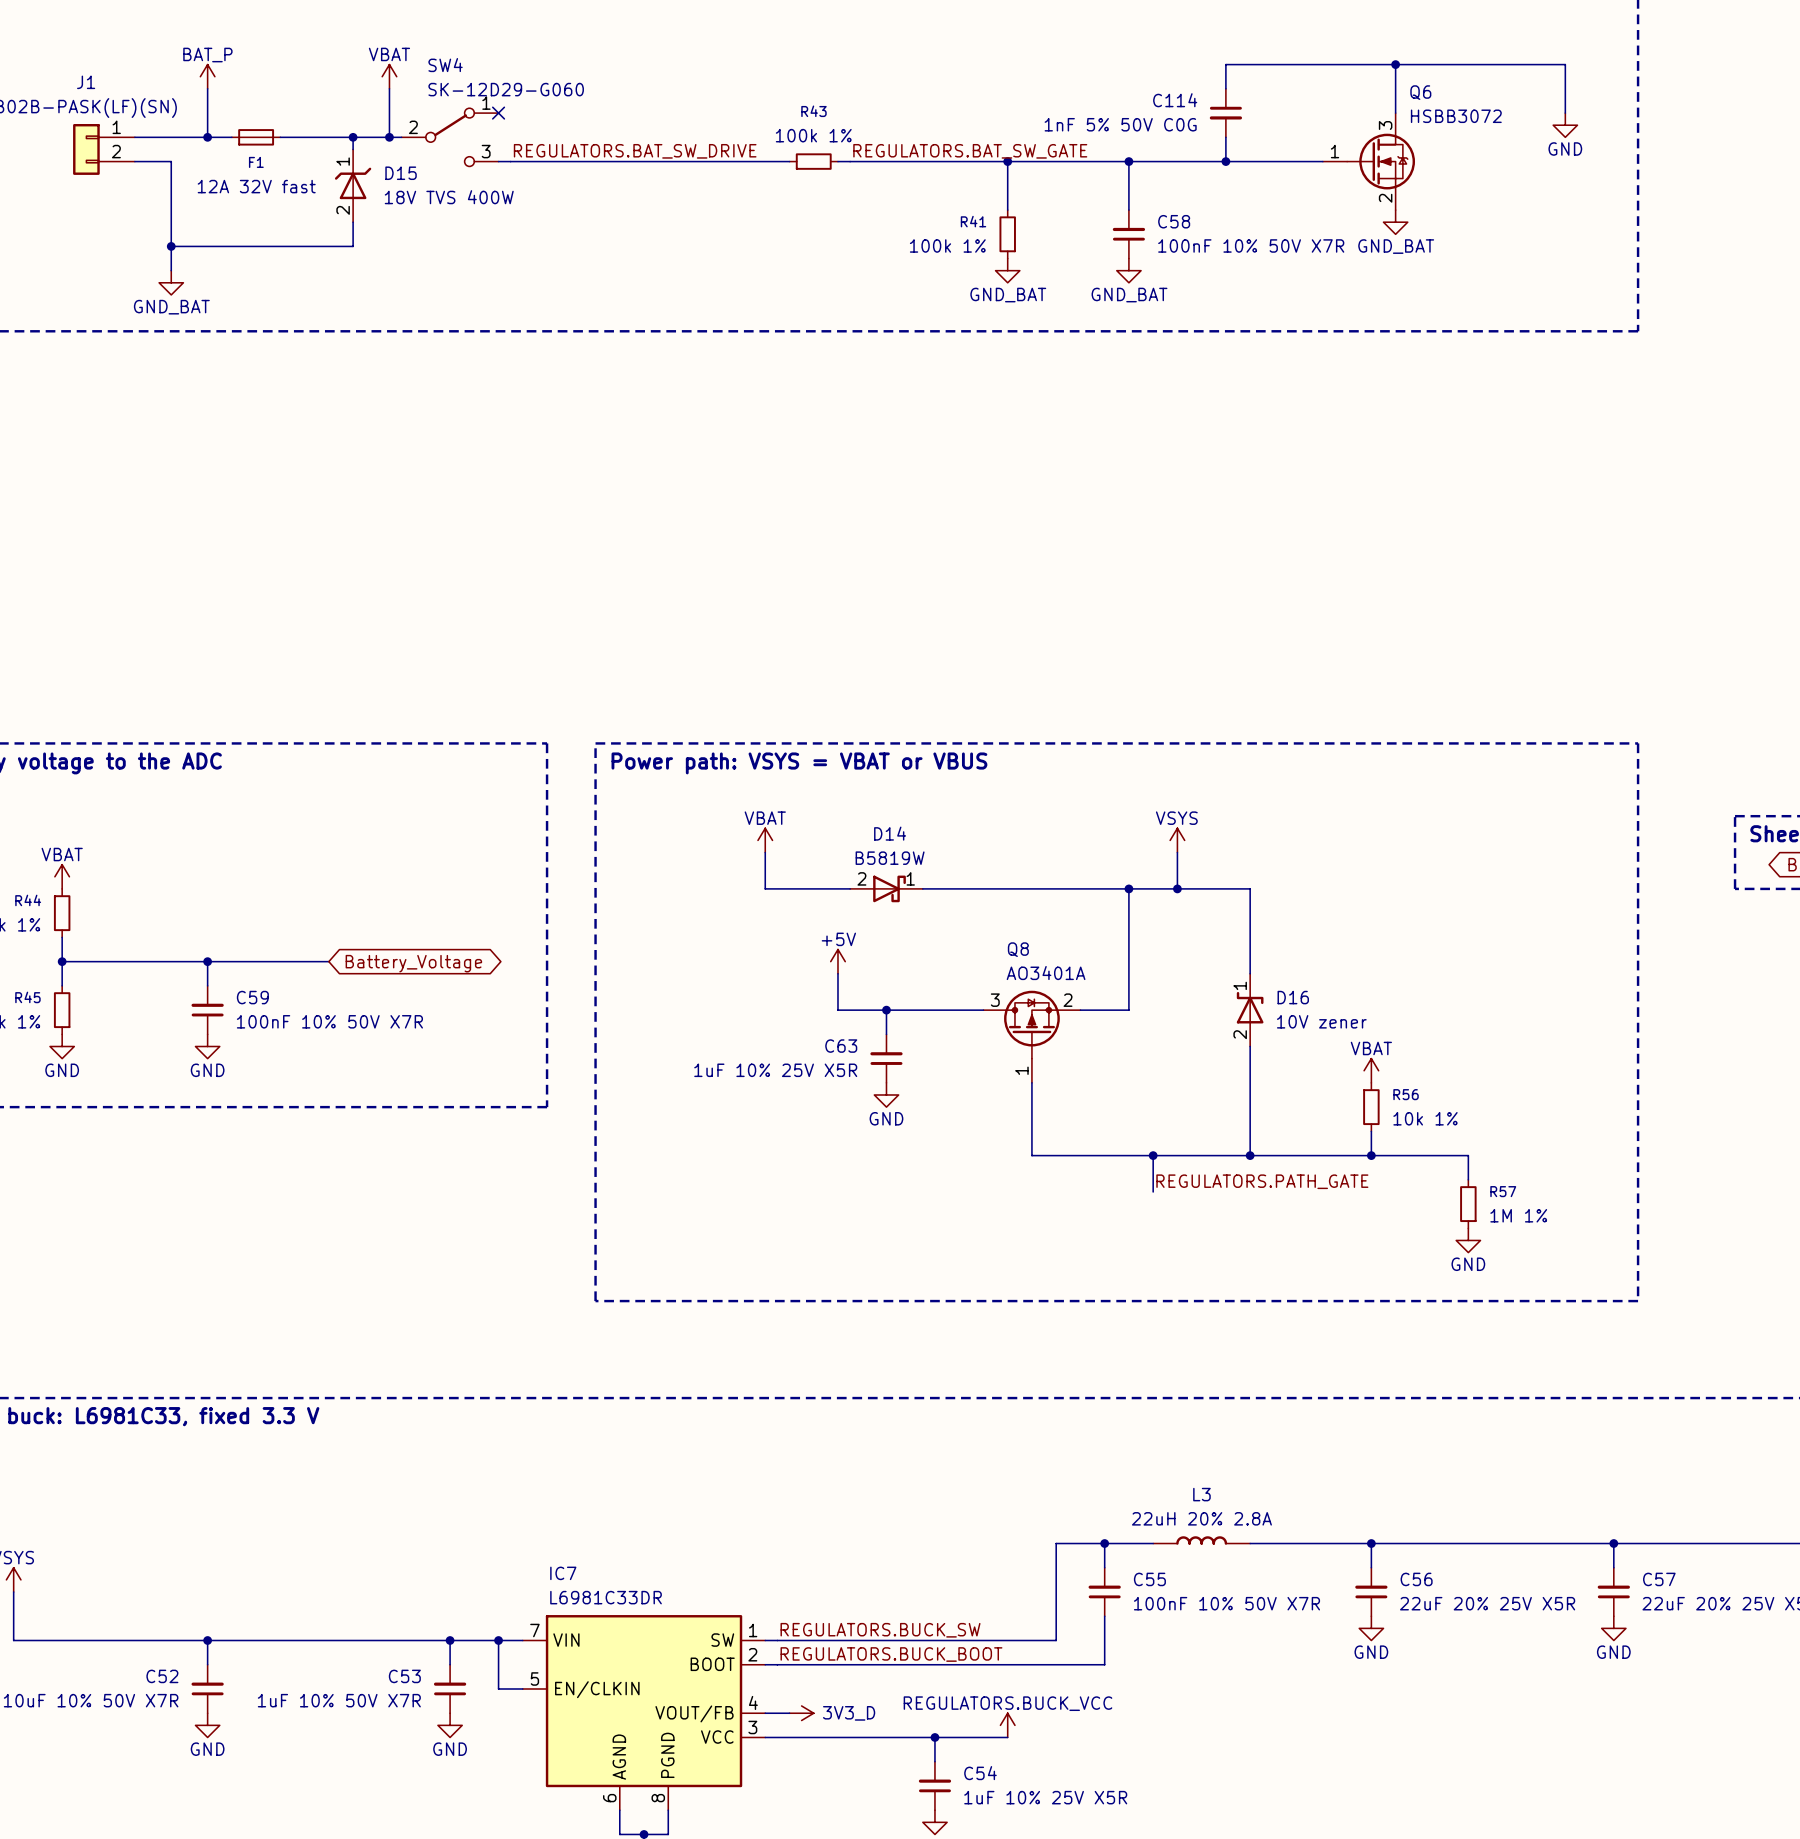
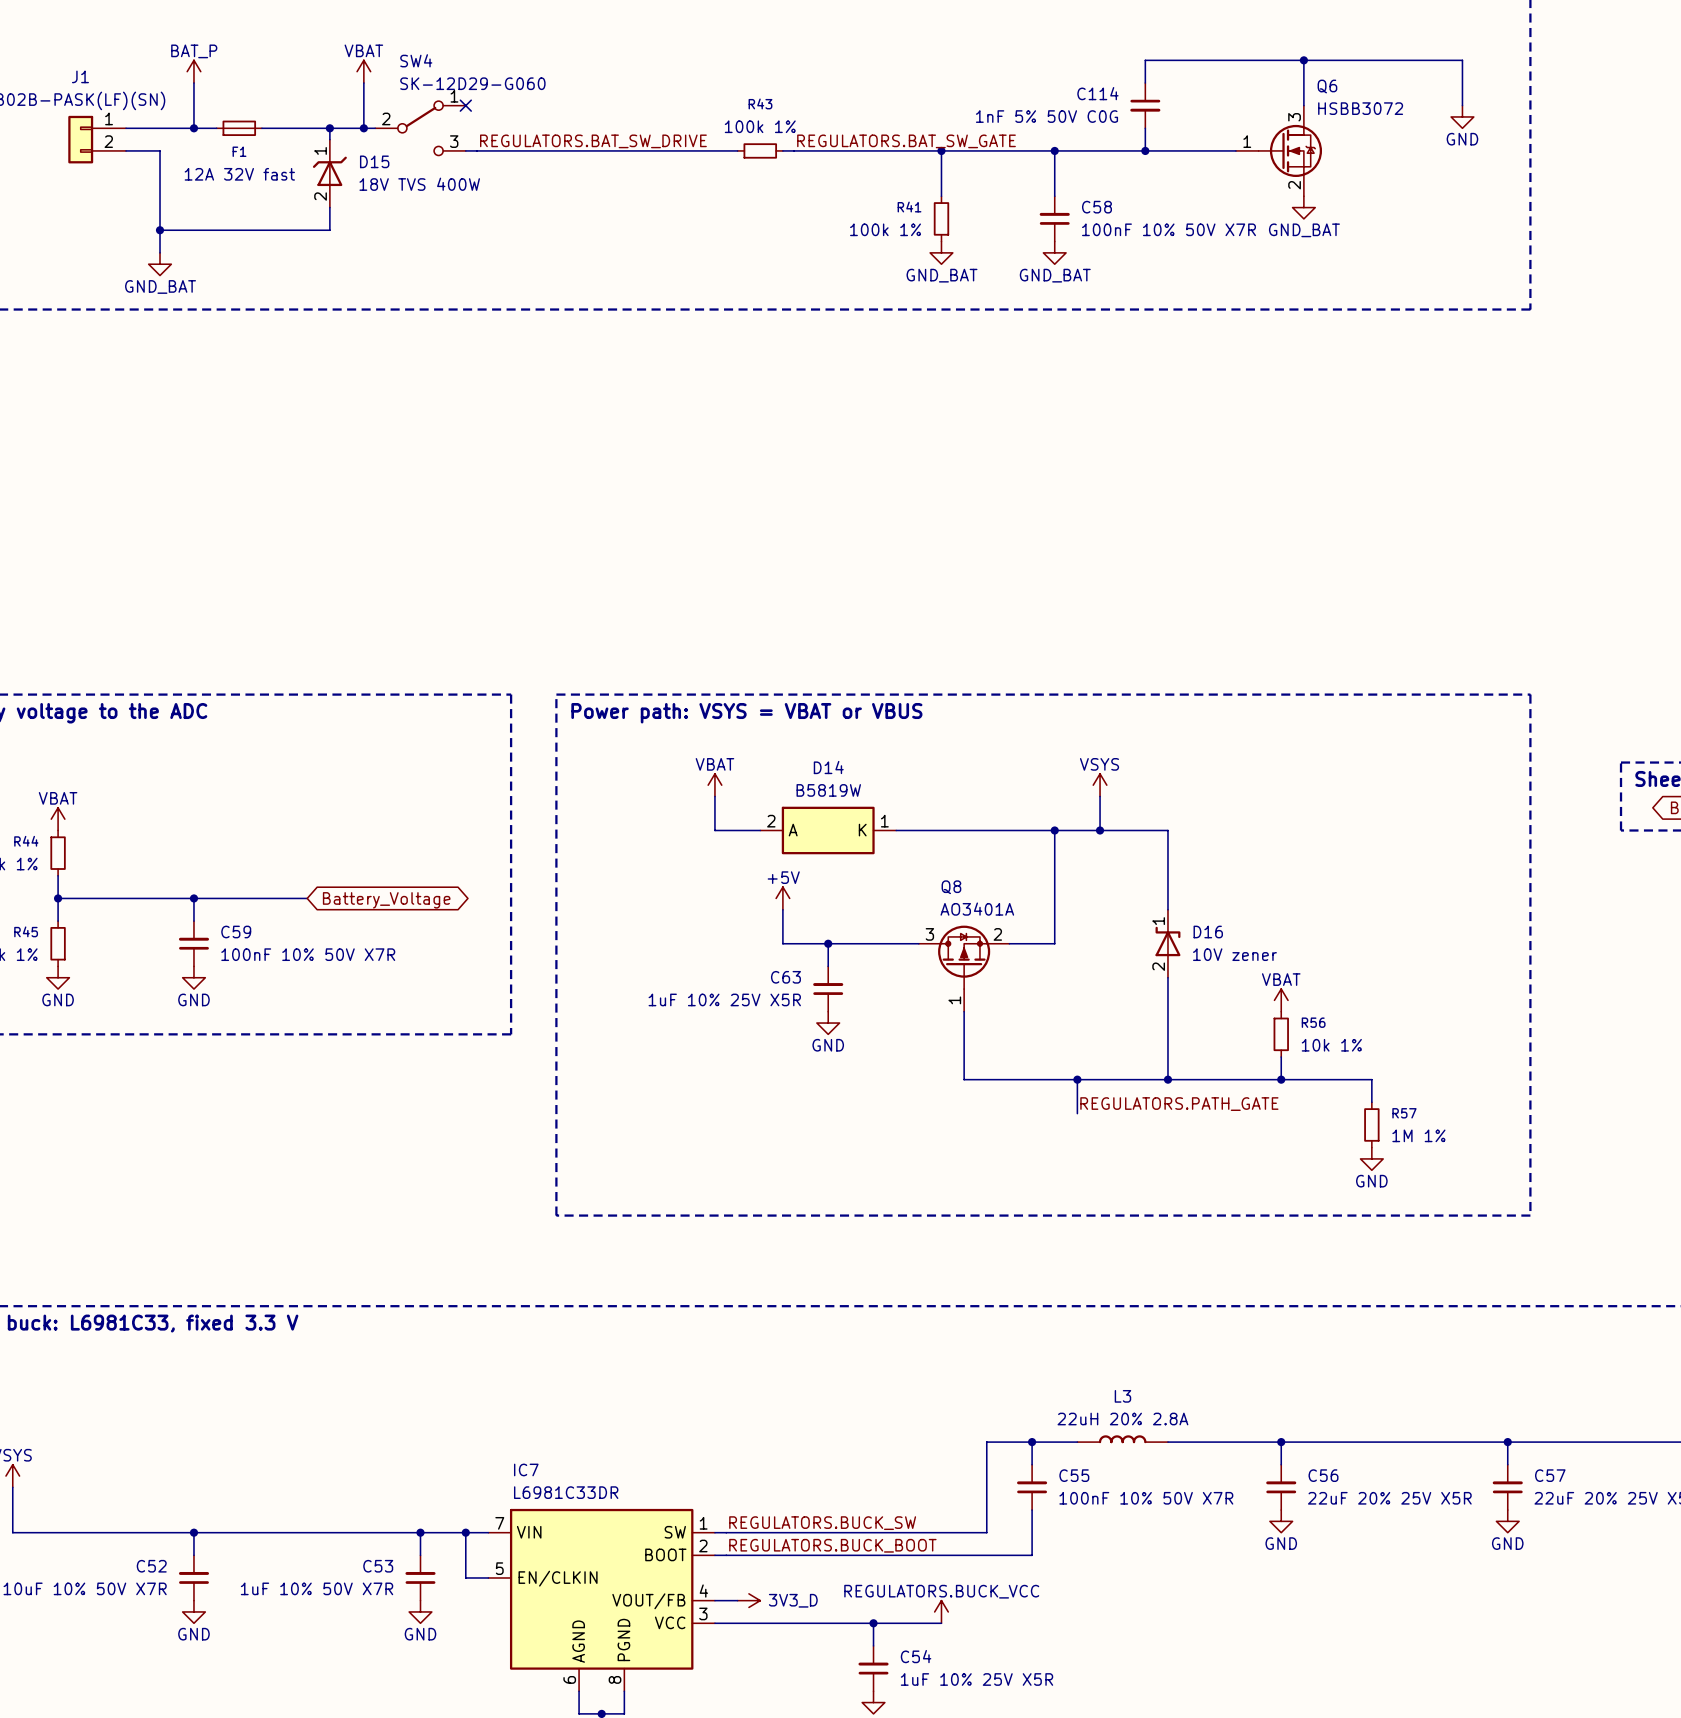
D14 symbol: [850, 875, 923, 903] -> [760, 806, 897, 855]

